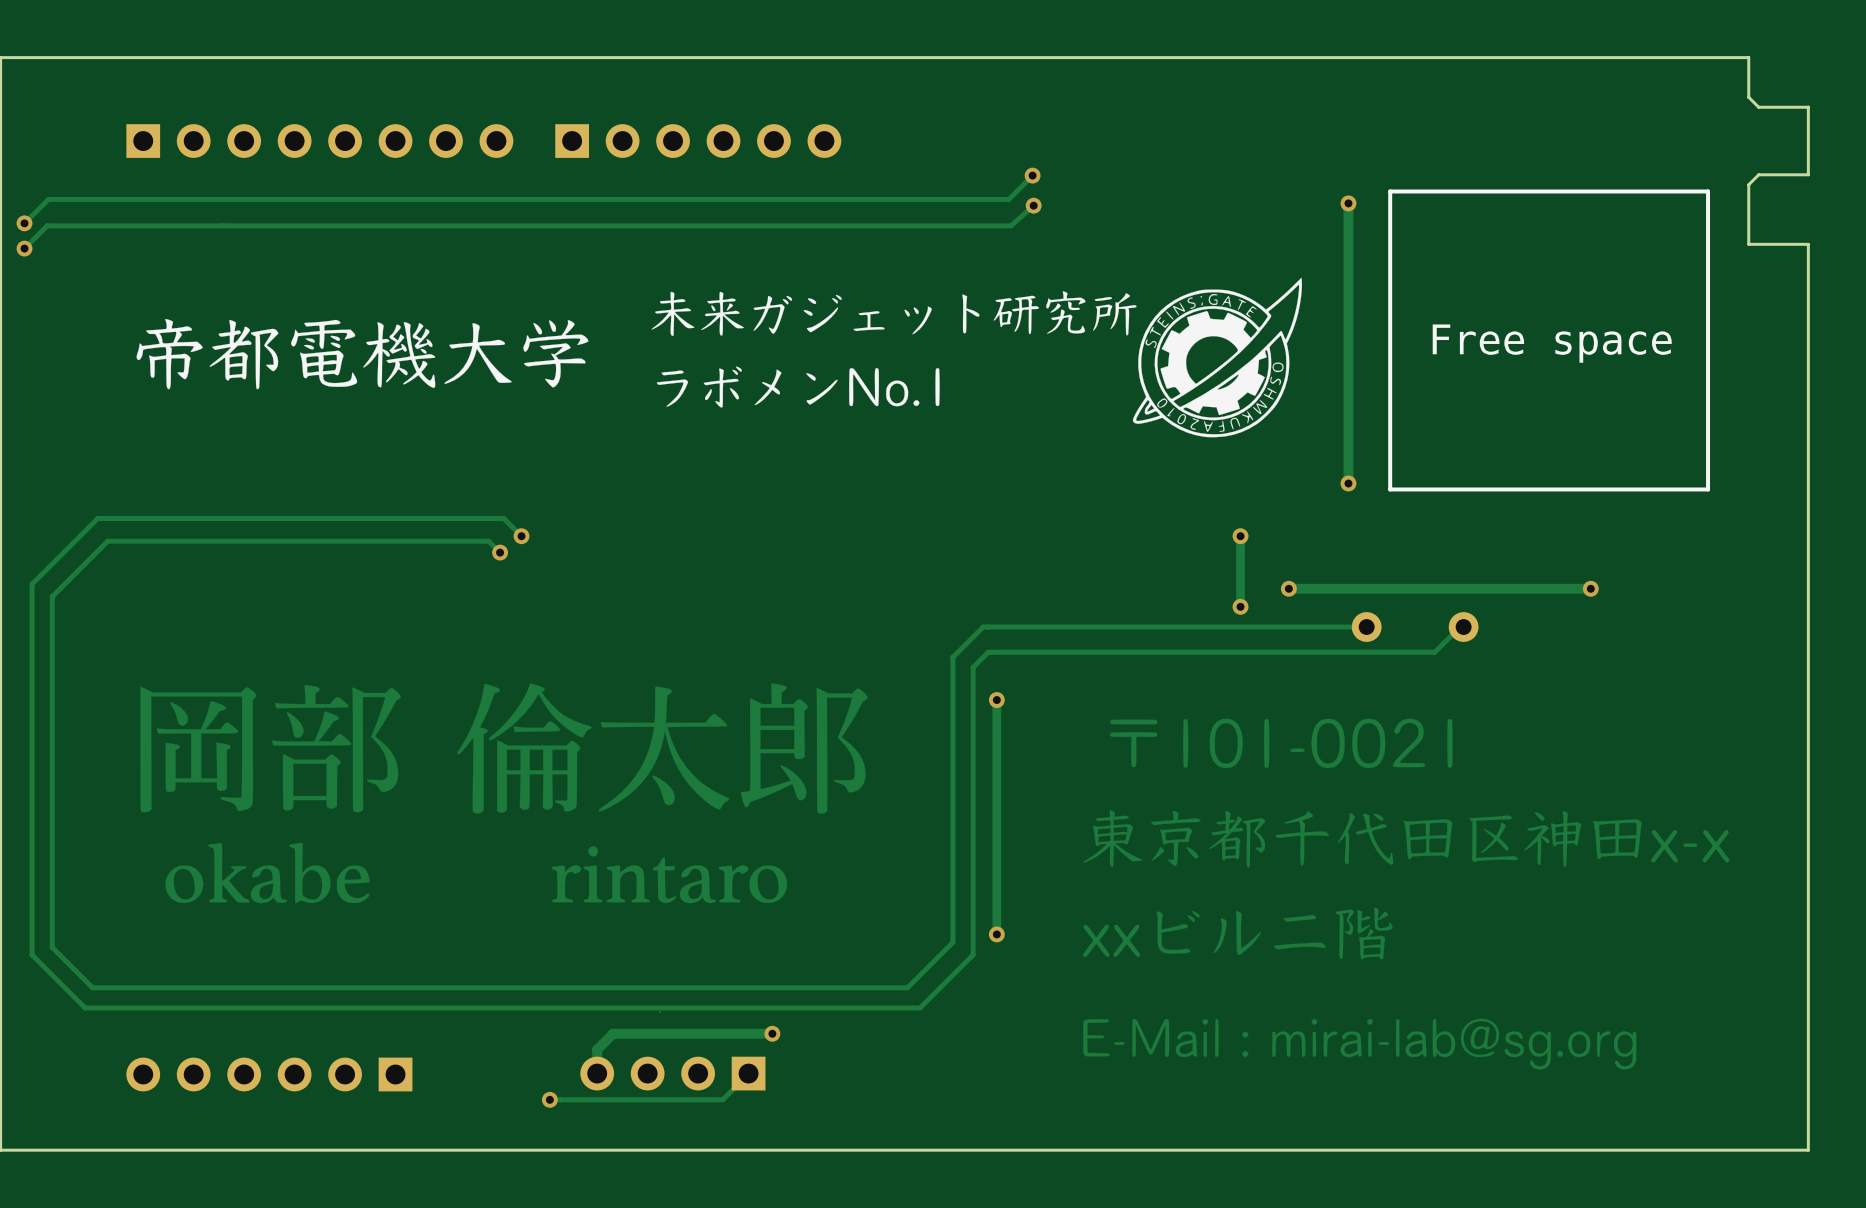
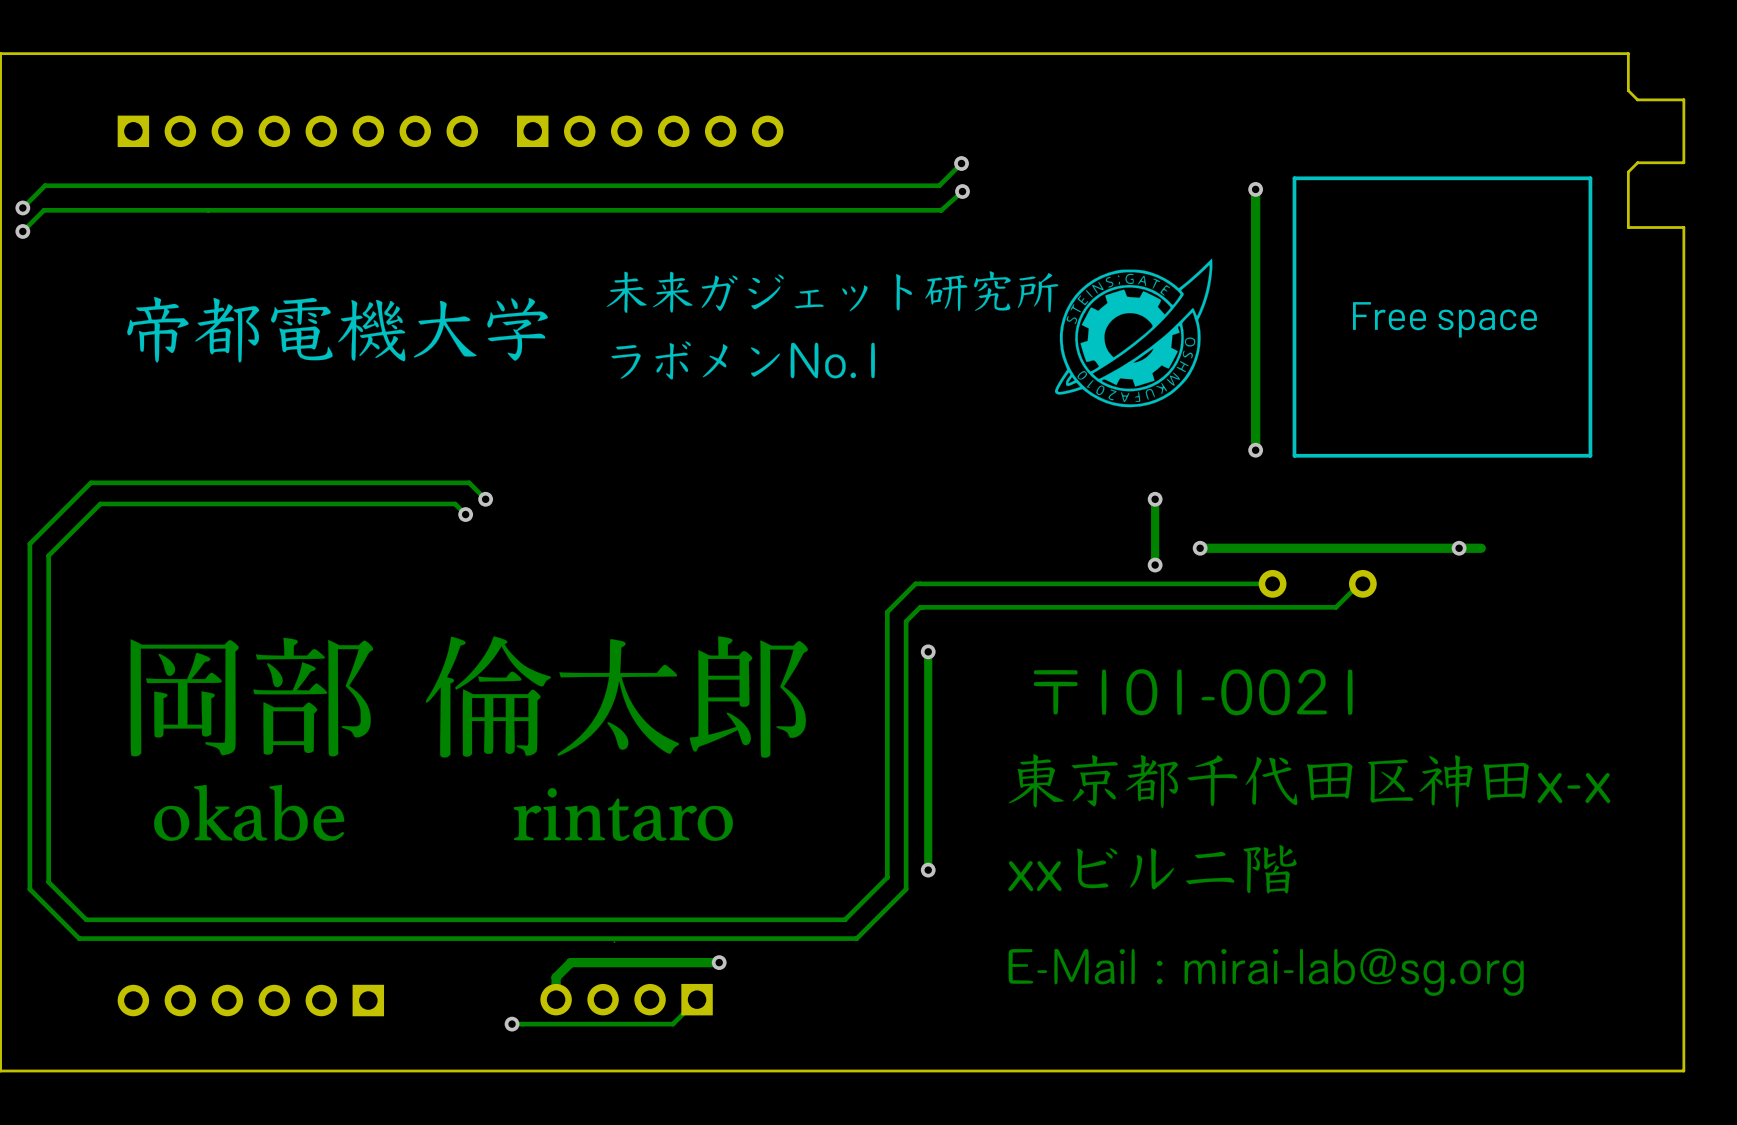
via position: (1590, 588) -> (1459, 548)

